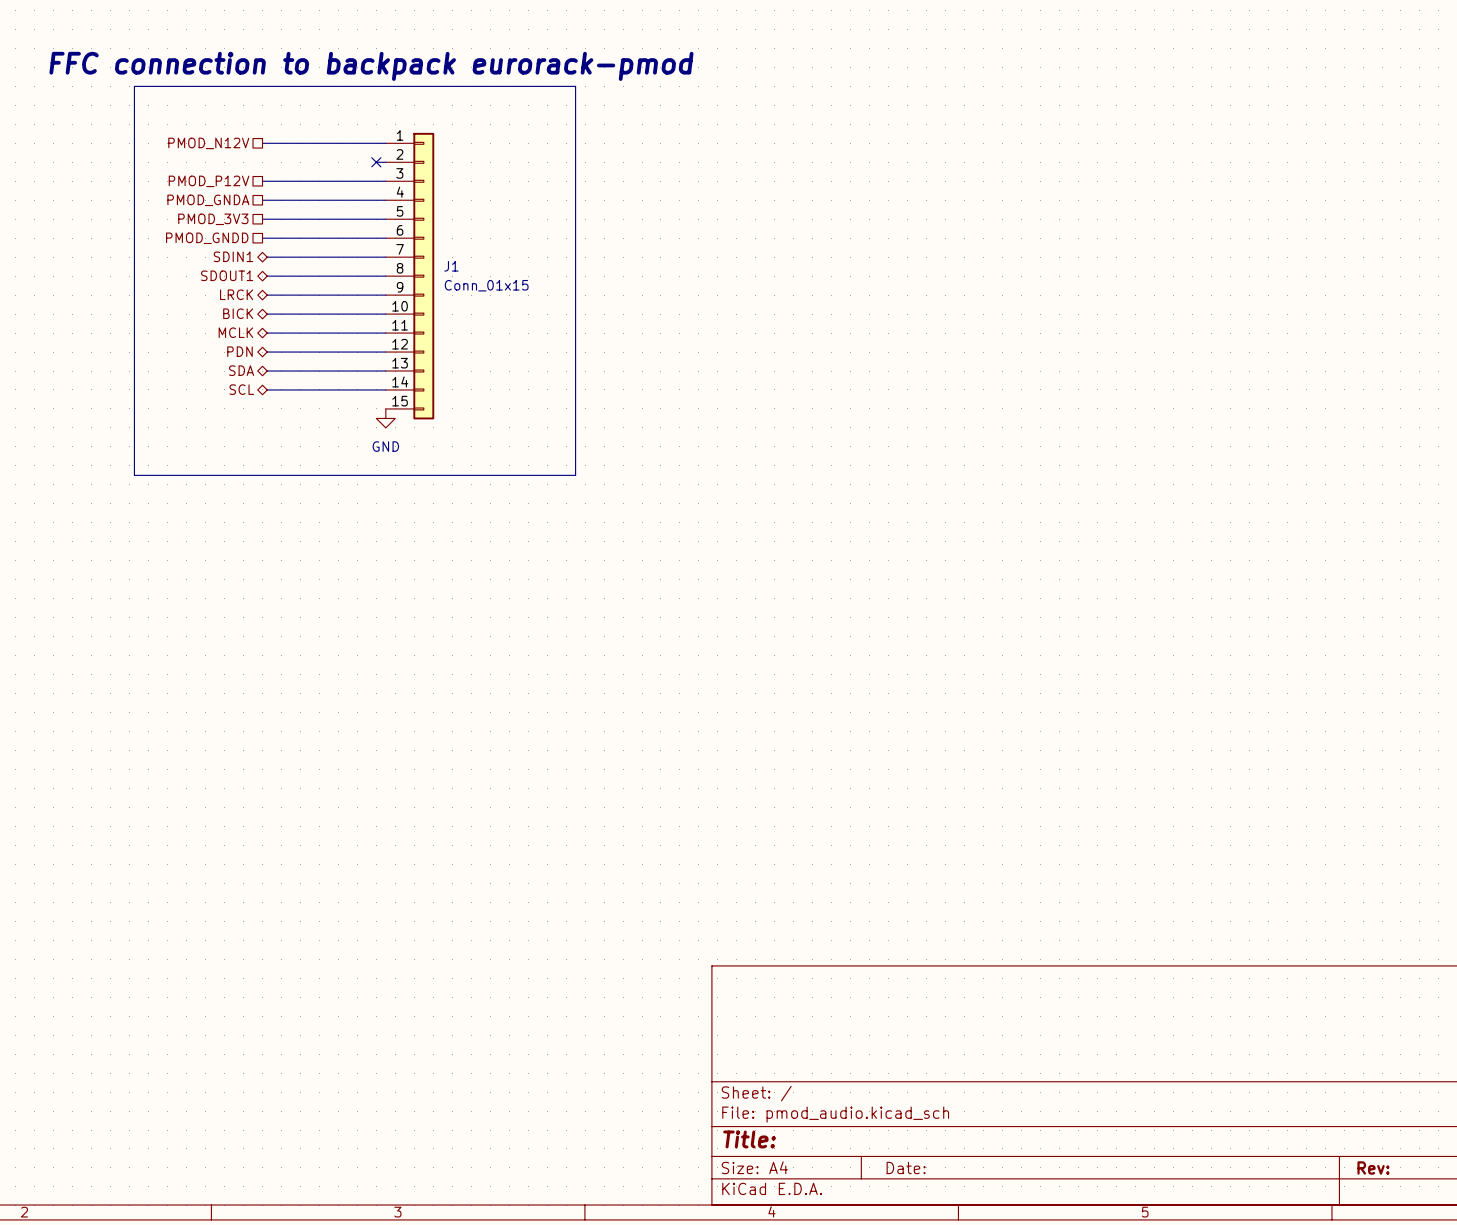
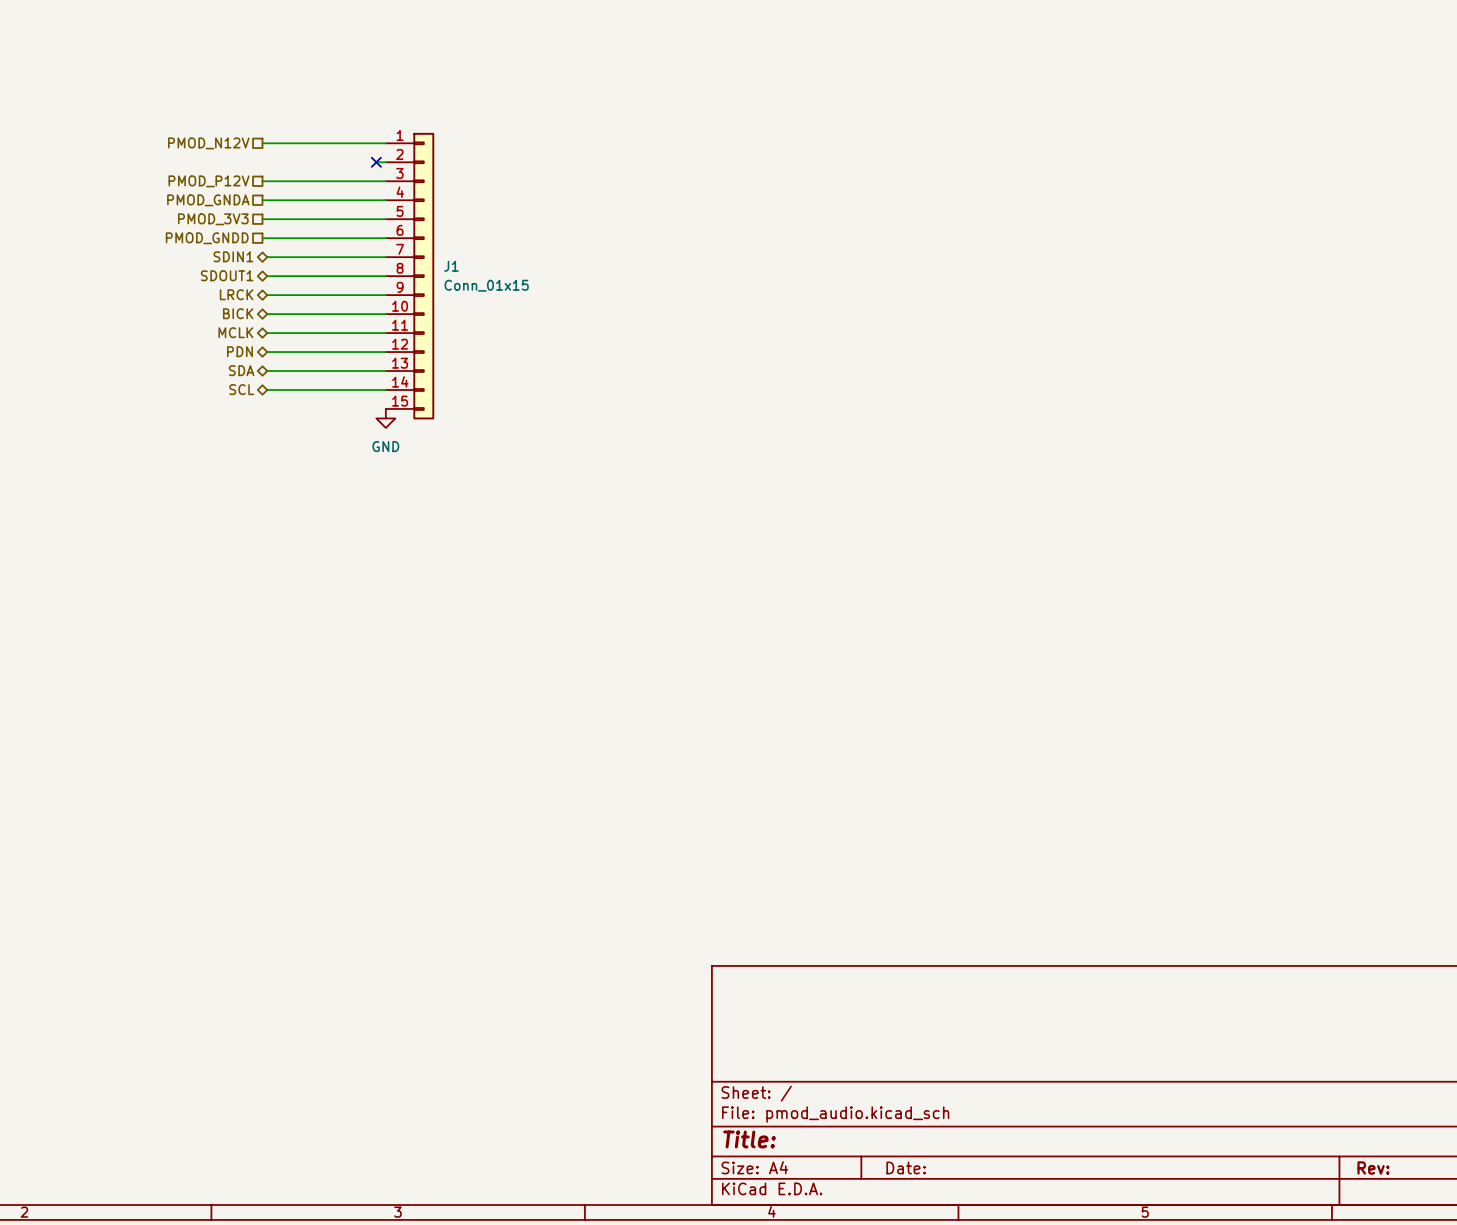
text: FFC connection to backpack eurorack-pmod (371, 66) -> none
line: (134, 86) (575, 86) (575, 475) (134, 475) (134, 86) -> none

